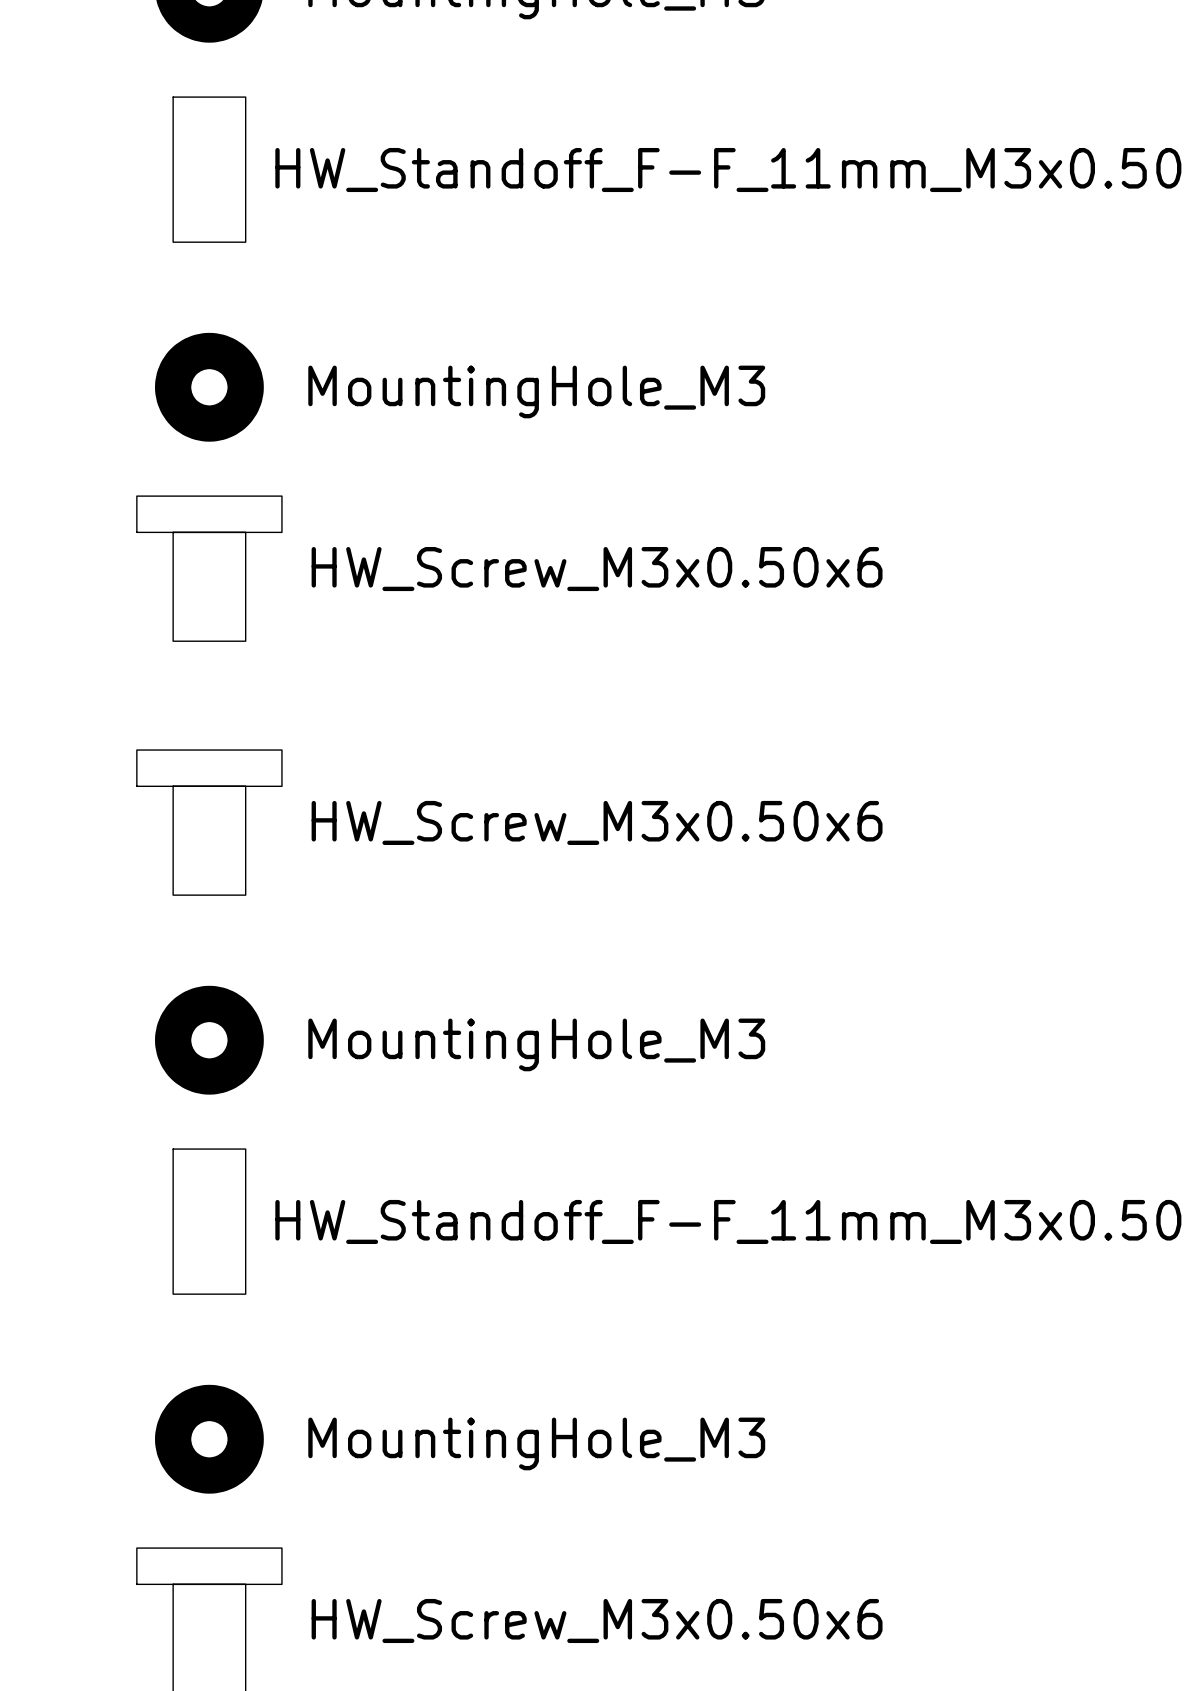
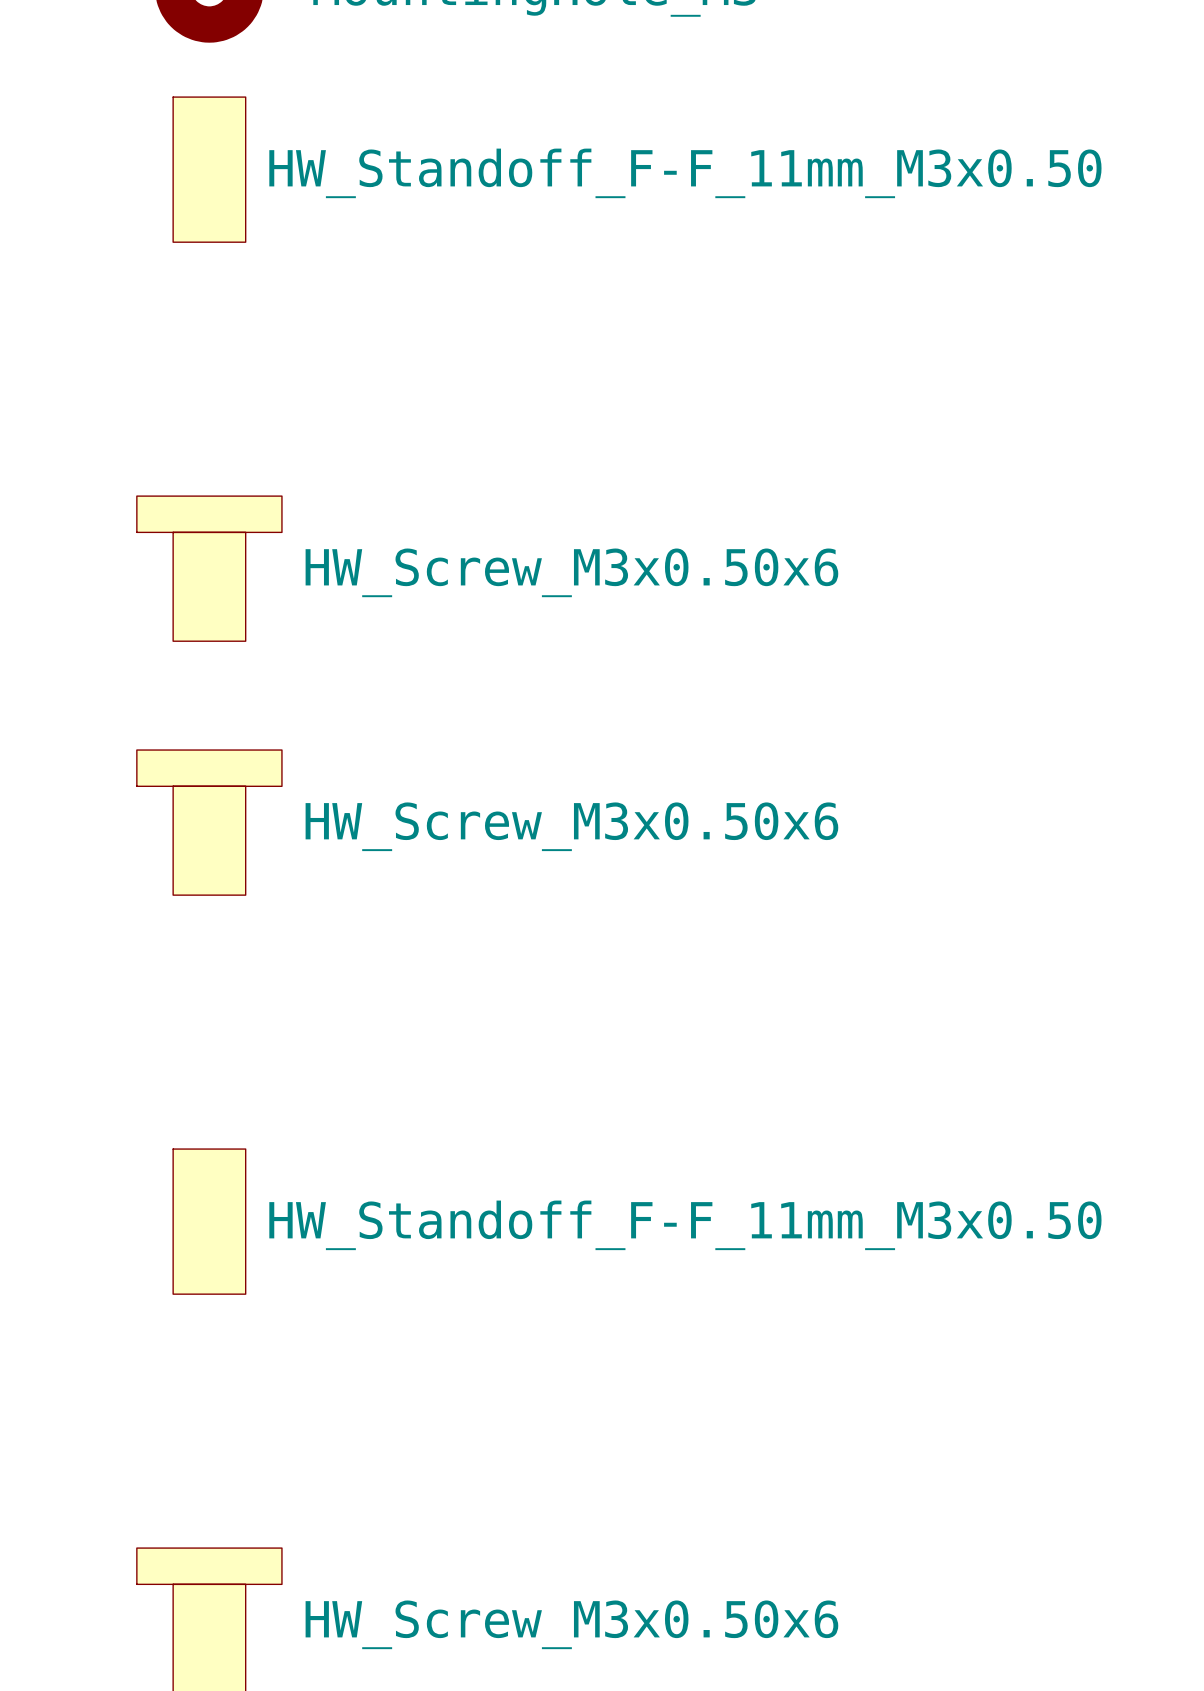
part: MountingHole_M3 (209, 387) -> none
part: MountingHole_M3 (209, 1040) -> none
part: MountingHole_M3 (209, 1439) -> none

